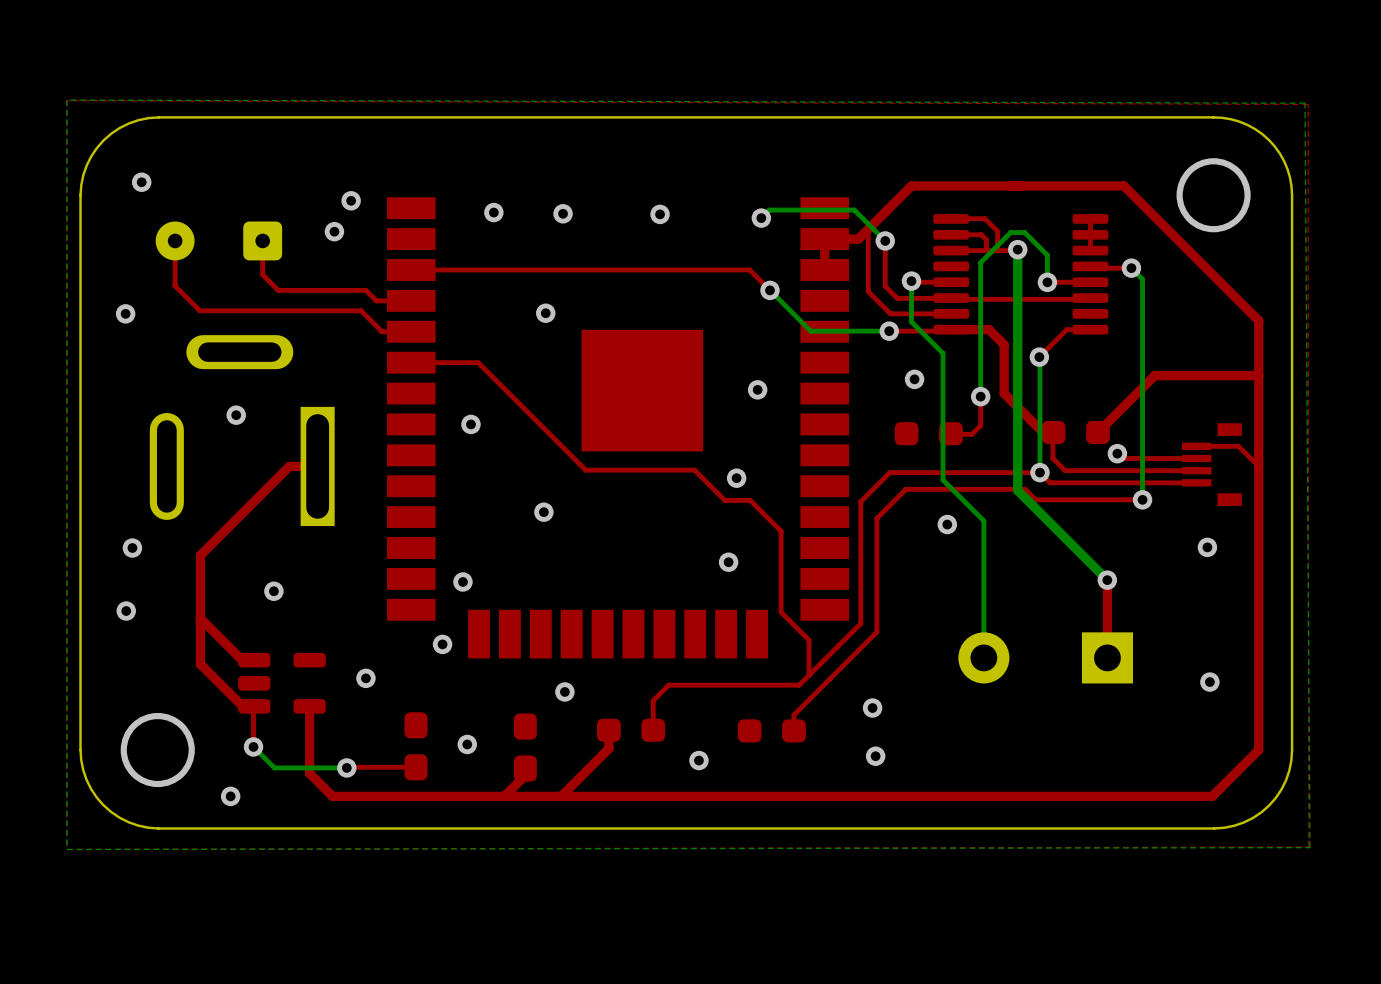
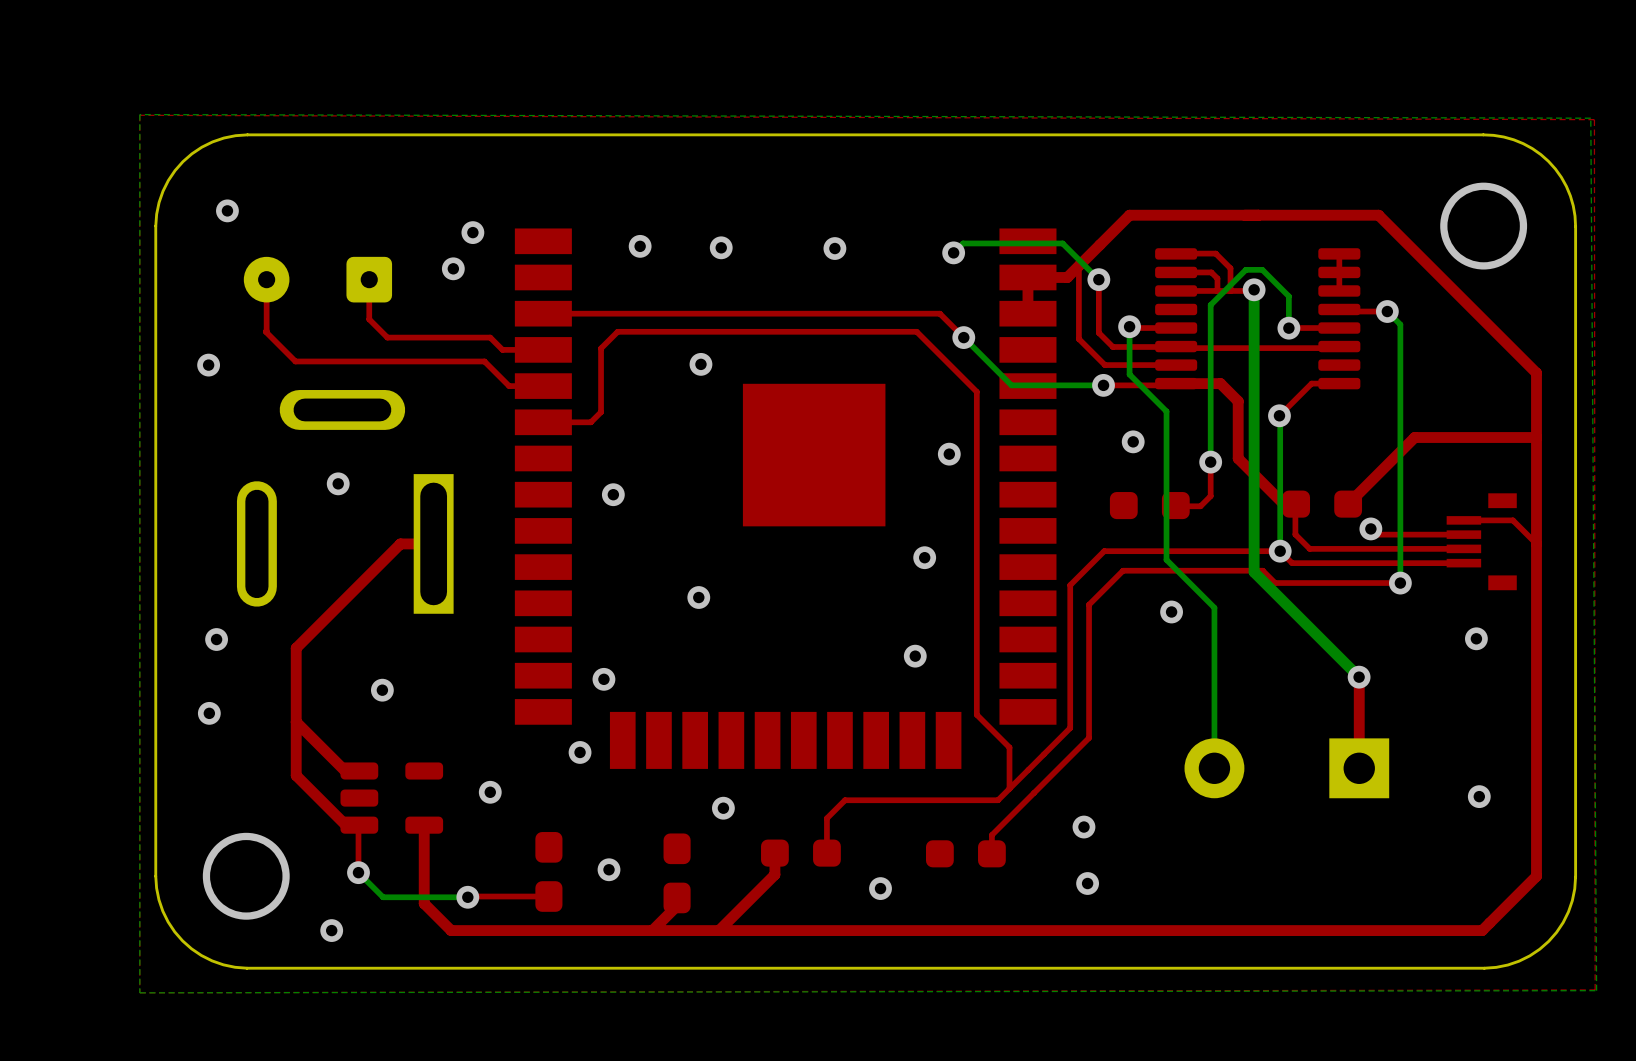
top track: (451, 362) (478, 362) (585, 470) (694, 470) (724, 500) (750, 500) (781, 531) -> (590, 422) (601, 412) (601, 348) (617, 331) (916, 331) (976, 391) (976, 619)

